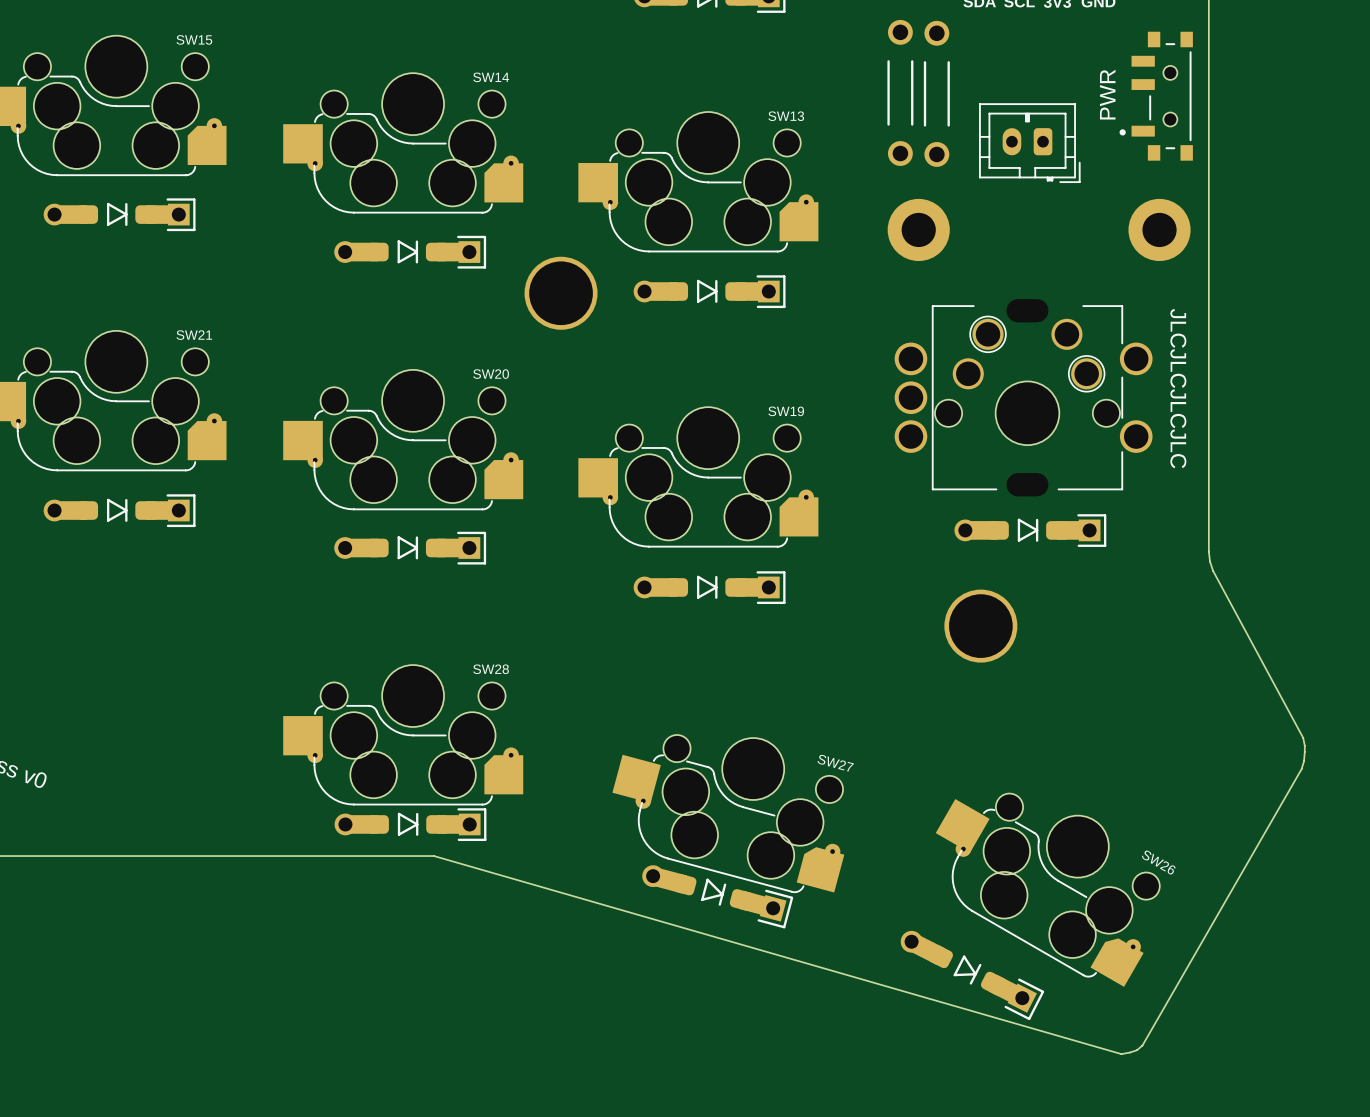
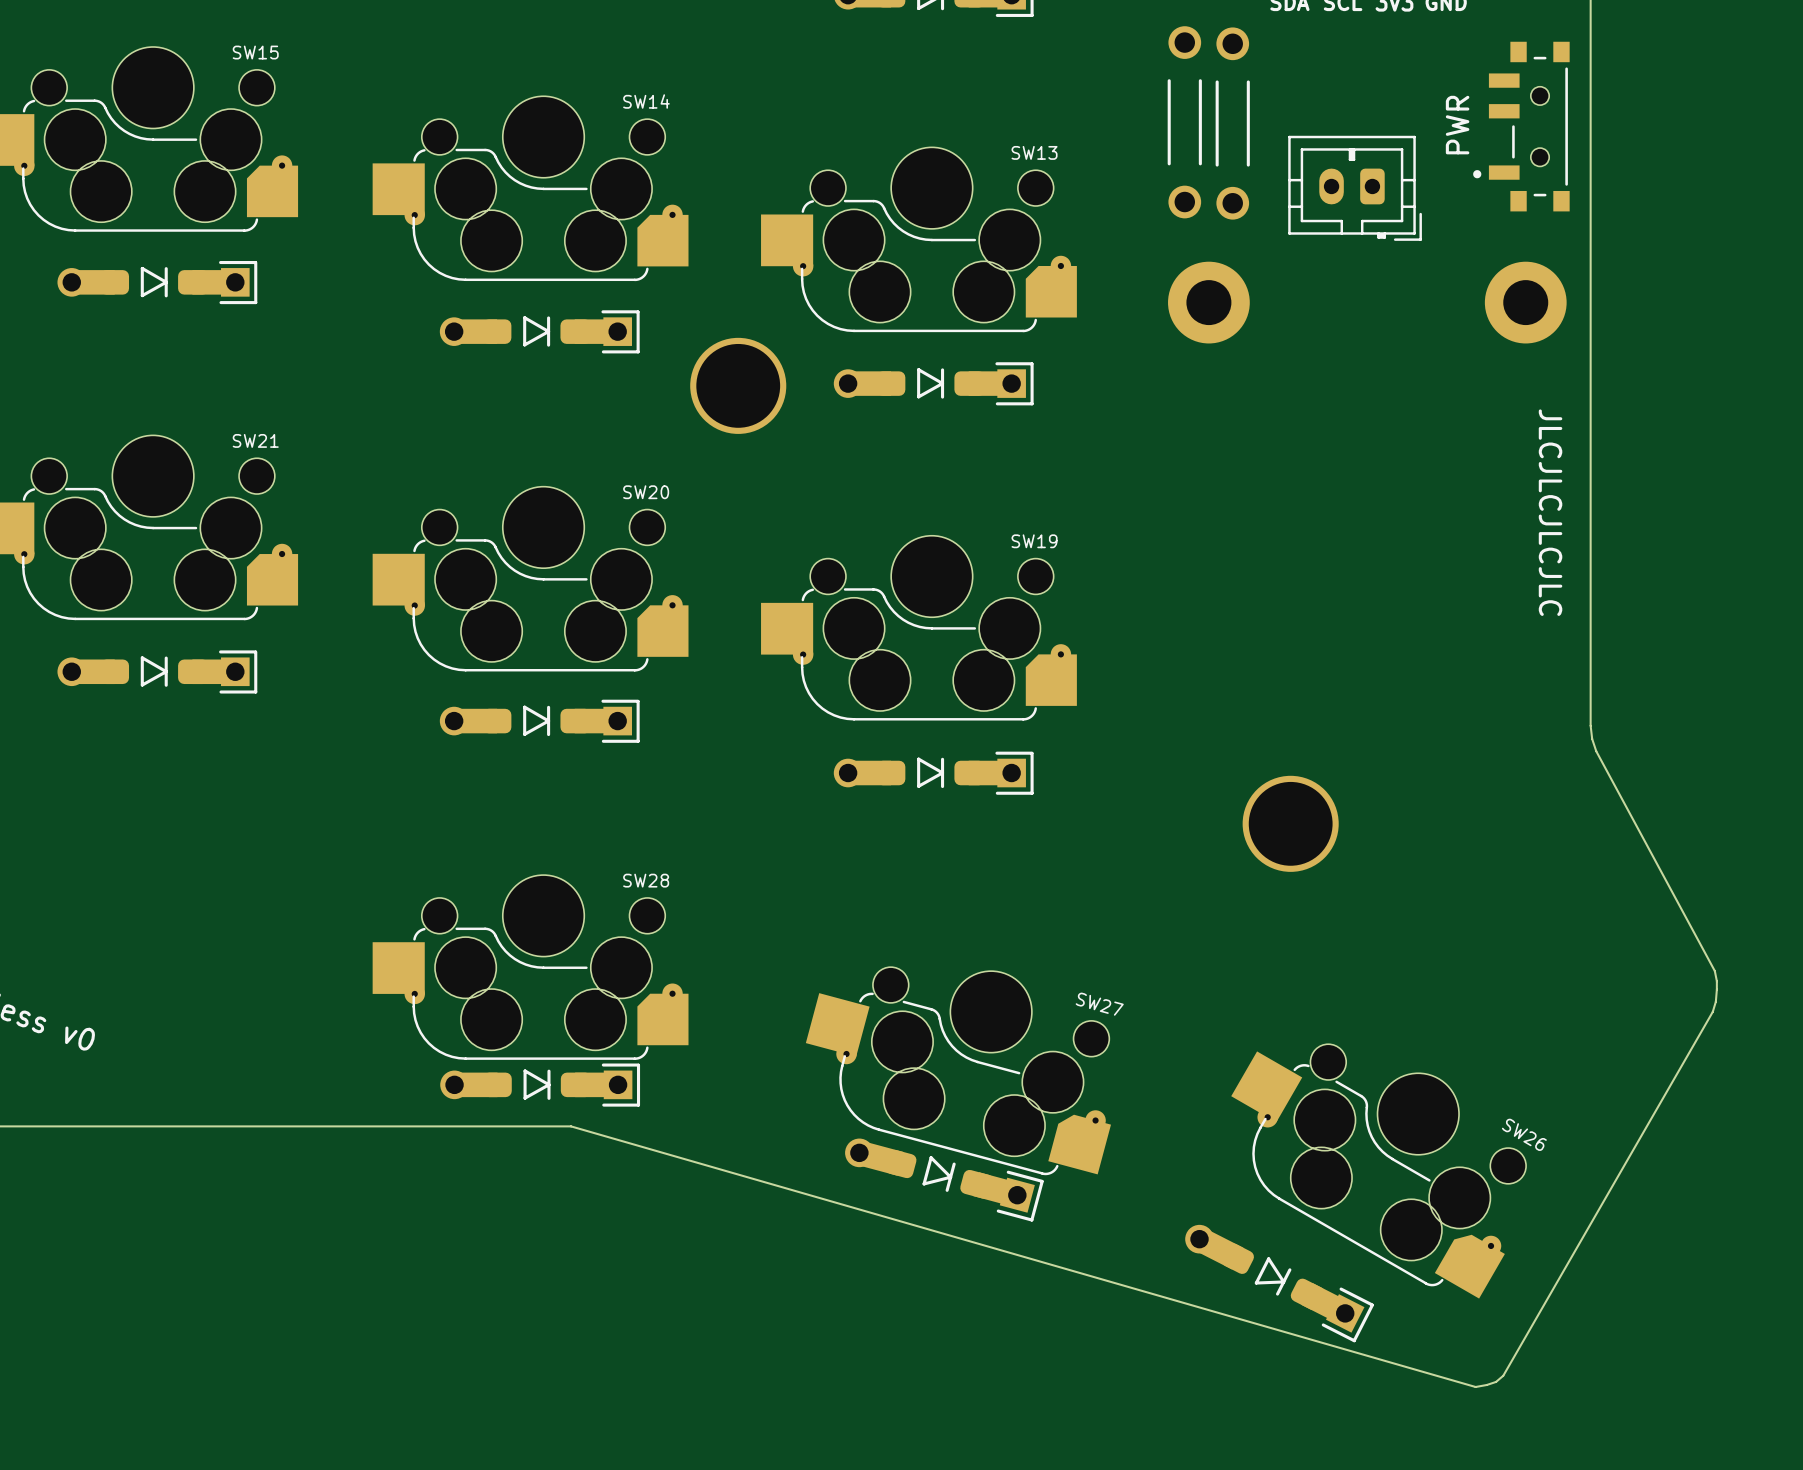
part: (1023, 397) -> none
part: (1030, 530) -> none

